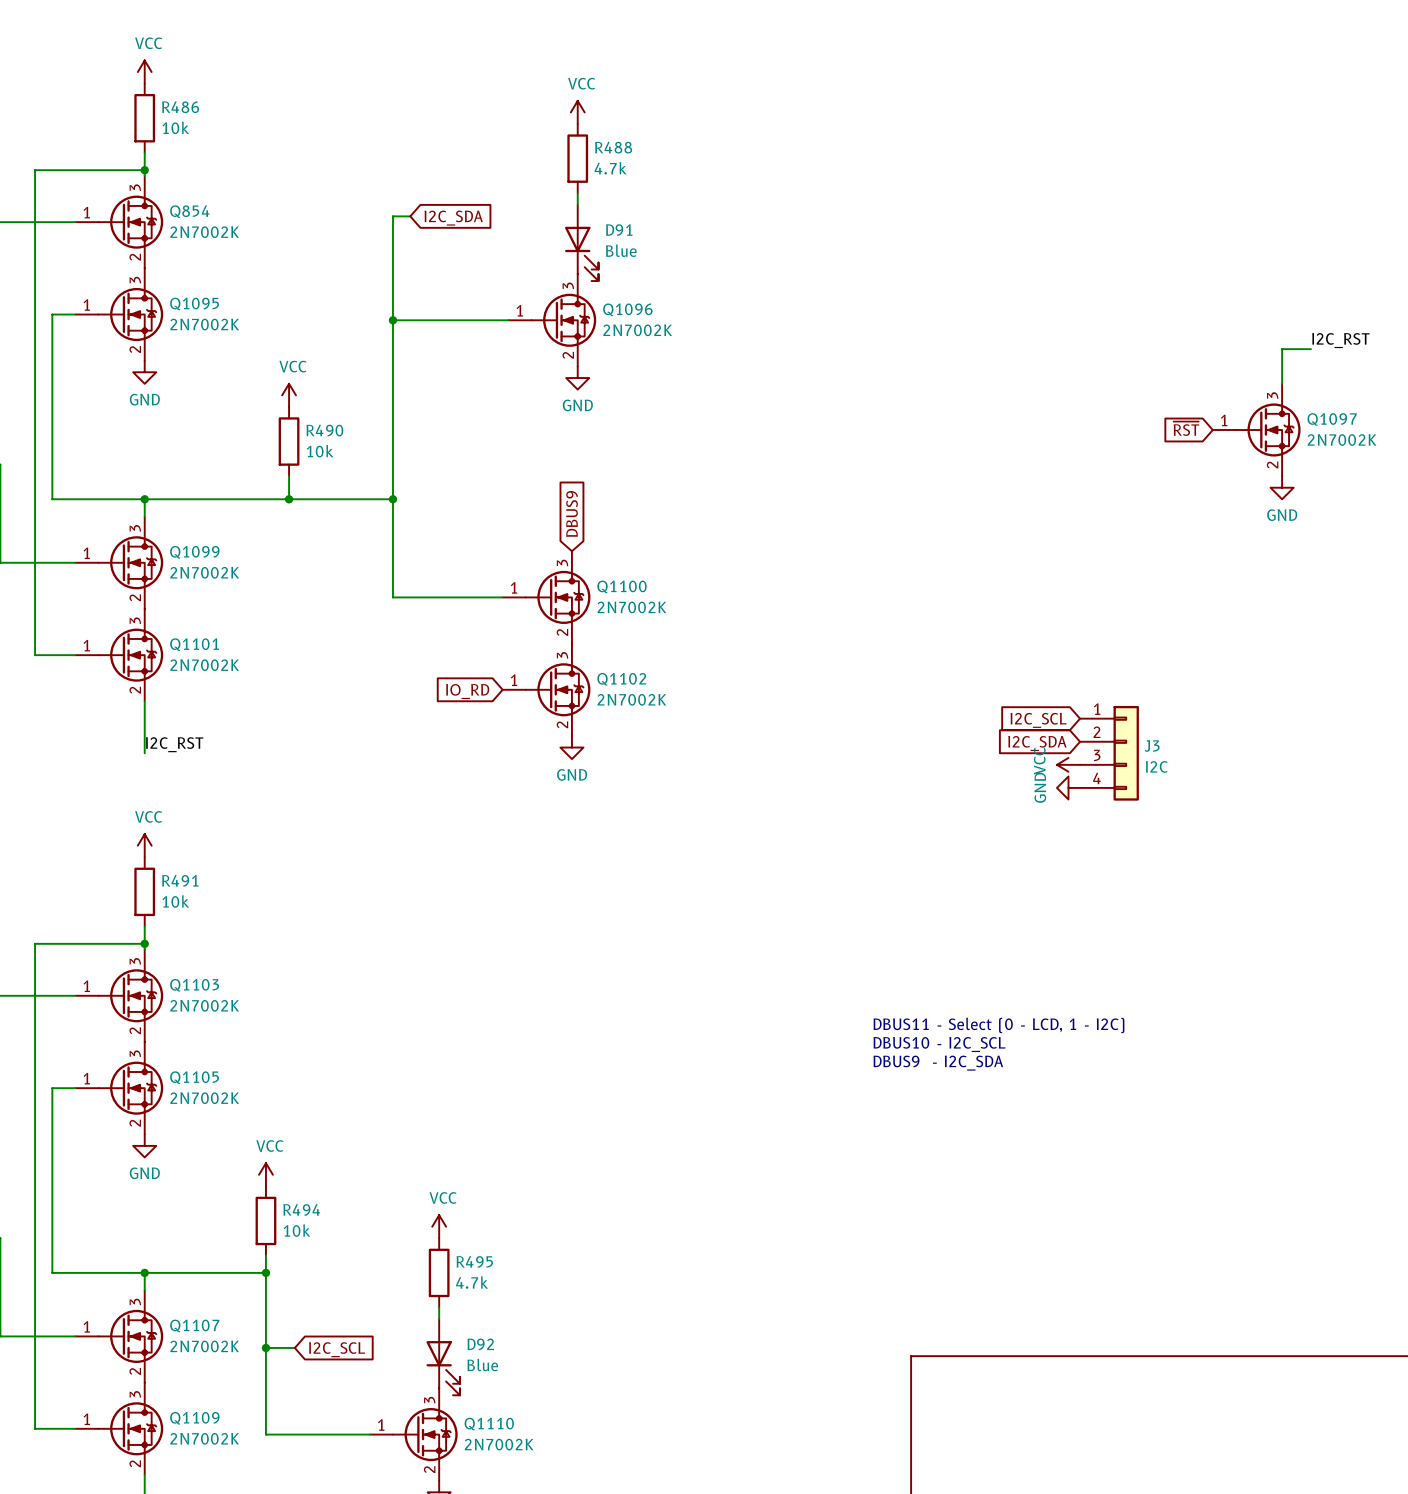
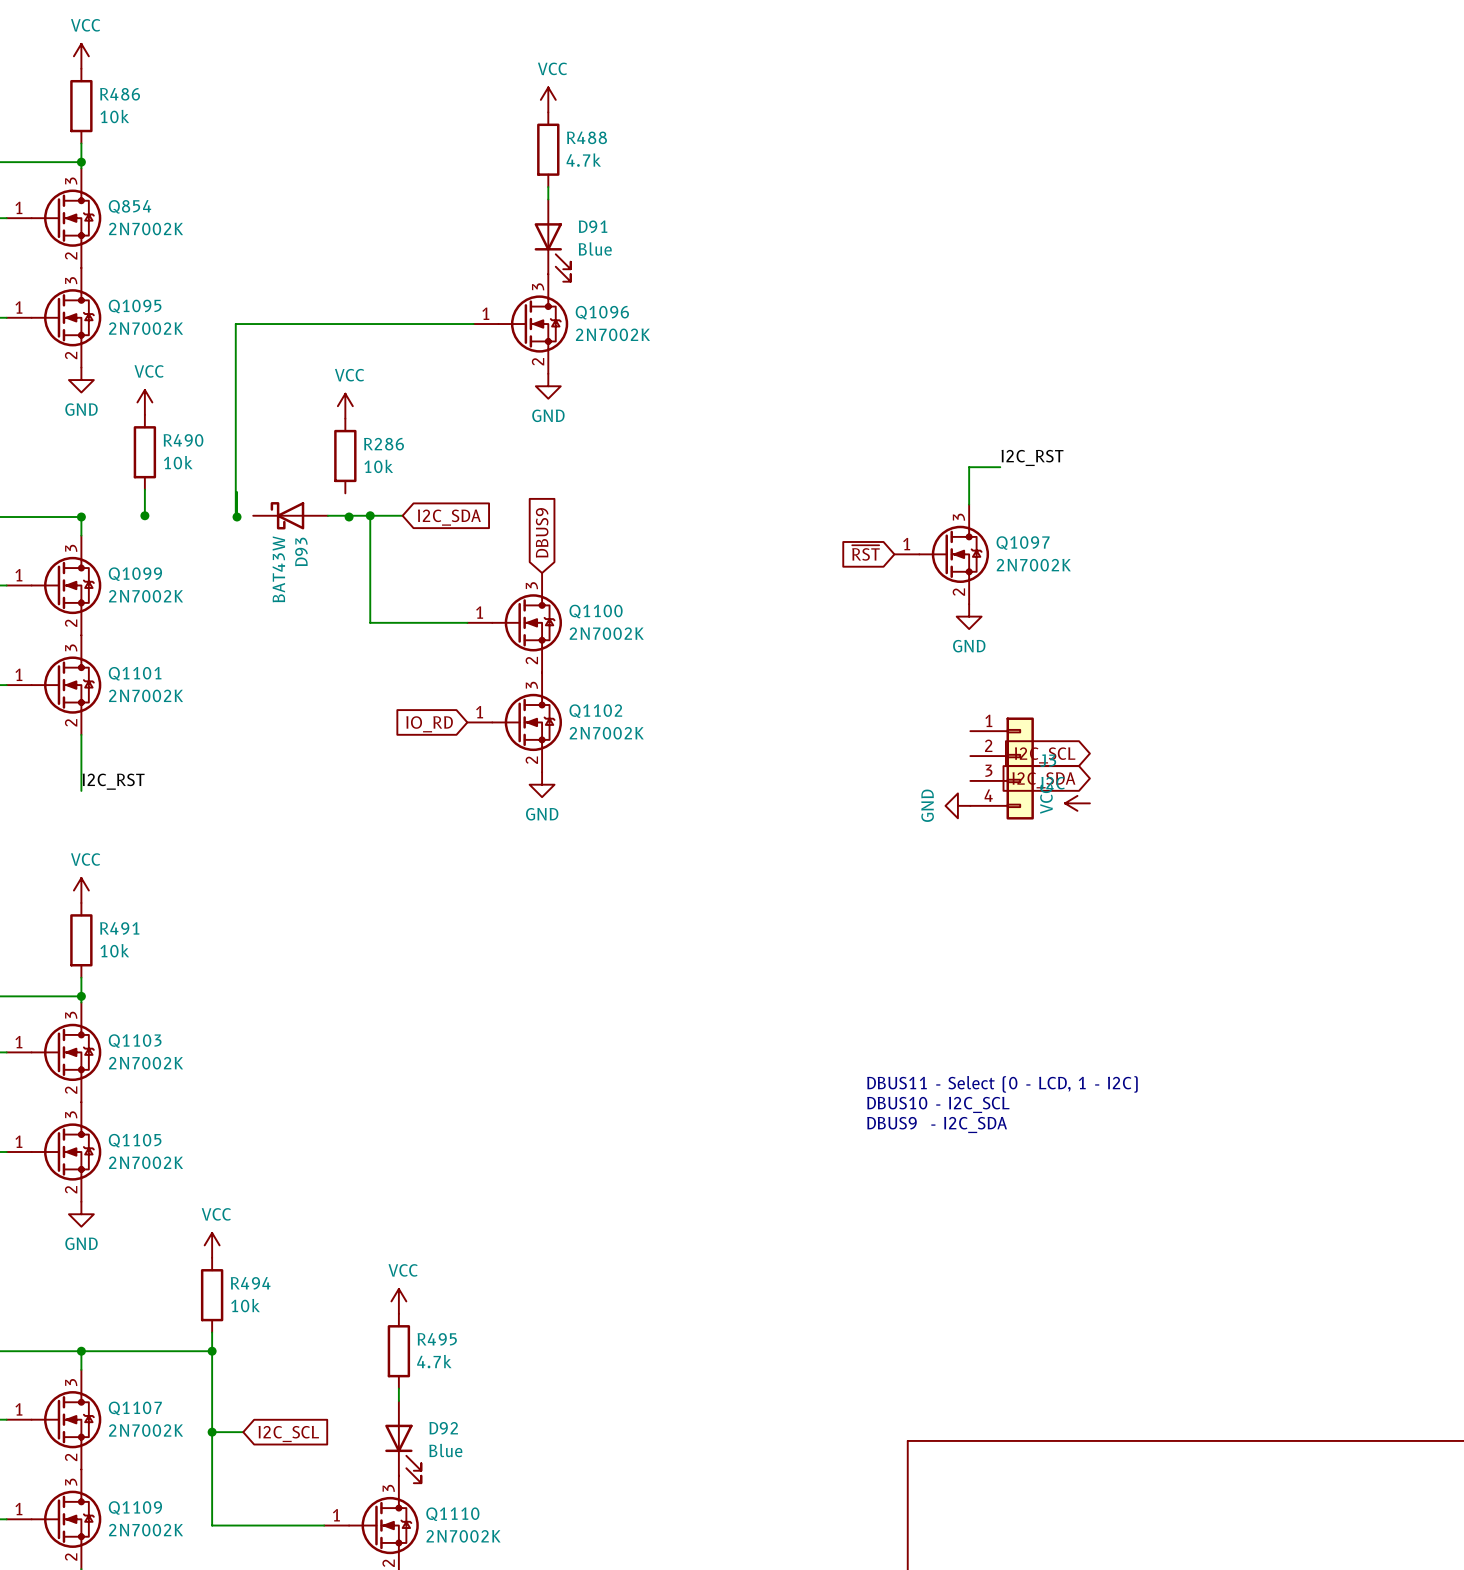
wire: (410, 216) (392, 216) (392, 597) (412, 597) -> (370, 515) (370, 622)
global label: I2C_SDA (453, 218) -> none
wire: none -> (349, 324) (235, 324) (235, 515)
junction: (392, 320) -> none
label: I2C_RST (1340, 340) -> none
wire: (1310, 349) (1282, 349) (1282, 383) -> none
power symbol: none -> VCC (144, 402)
power symbol: VCC (289, 395) -> none
power symbol: none -> VCC (345, 406)
global label: ~{RST} (1186, 428) -> none
Q1097 position: (1256, 429) -> (941, 554)
R490 position: (289, 441) -> (144, 452)
R286: none -> 10k (345, 455)
label: none -> I2C_RST (1032, 457)
wire: none -> (1000, 467) (969, 467) (969, 504)
wire: none -> (144, 489) (144, 515)
power symbol: GND (1282, 487) -> none
junction: none -> (144, 515)
D93: none -> BAT43W (290, 515)
wire: none -> (327, 515) (402, 515)
junction: none -> (370, 515)
wire: (144, 499) (392, 499) -> none
global label: none -> I2C_SDA (449, 517)
global label: none -> ~{RST} (865, 552)
power symbol: none -> GND (969, 616)
J3 position: (1109, 753) -> (1002, 768)
power symbol: none -> GND (957, 805)
power symbol: GND (1068, 787) -> none

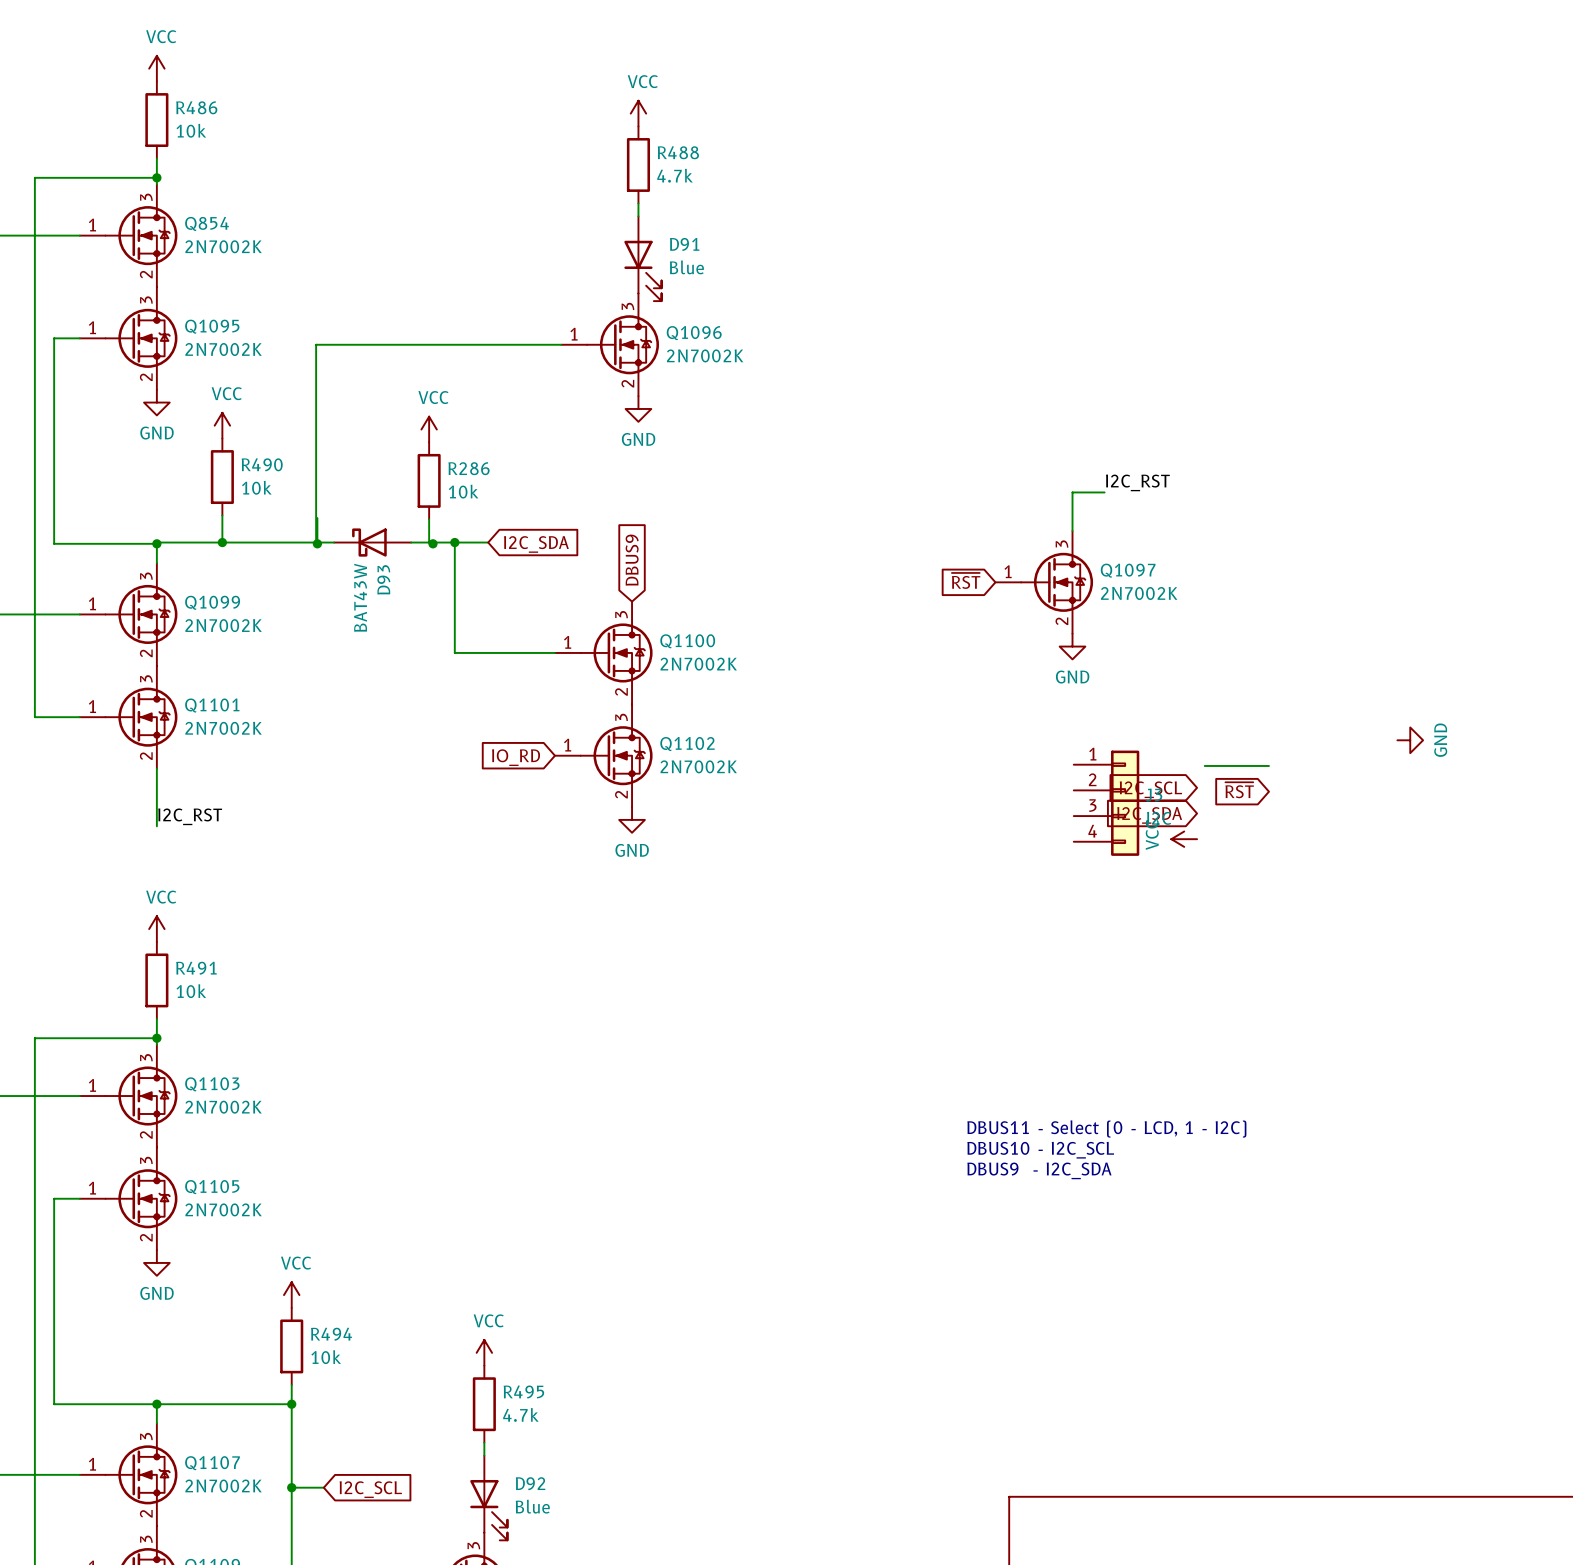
wire: none -> (429, 519) (429, 542)
wire: none -> (334, 542) (155, 543)
power symbol: none -> GND (1410, 740)
wire: none -> (1204, 765) (1268, 765)
global label: none -> ~{RST} (1239, 790)
power symbol: GND (957, 805) -> none

